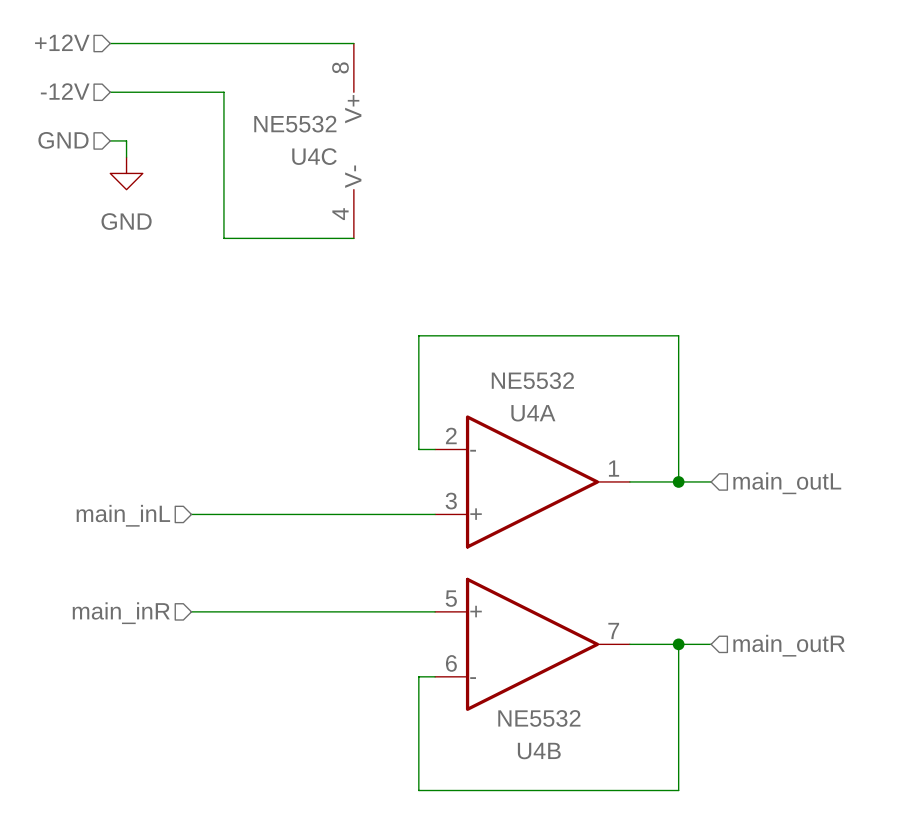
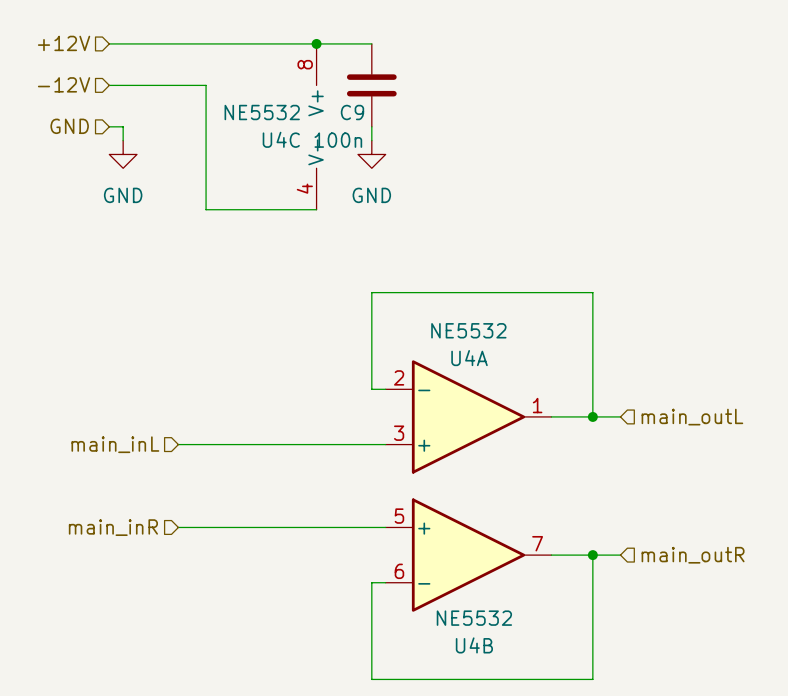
wire: none -> (316, 43) (371, 43)
junction: none -> (316, 43)
C9: none -> 100n (371, 85)
wire: none -> (371, 126) (371, 140)
power symbol: none -> GND (371, 154)

